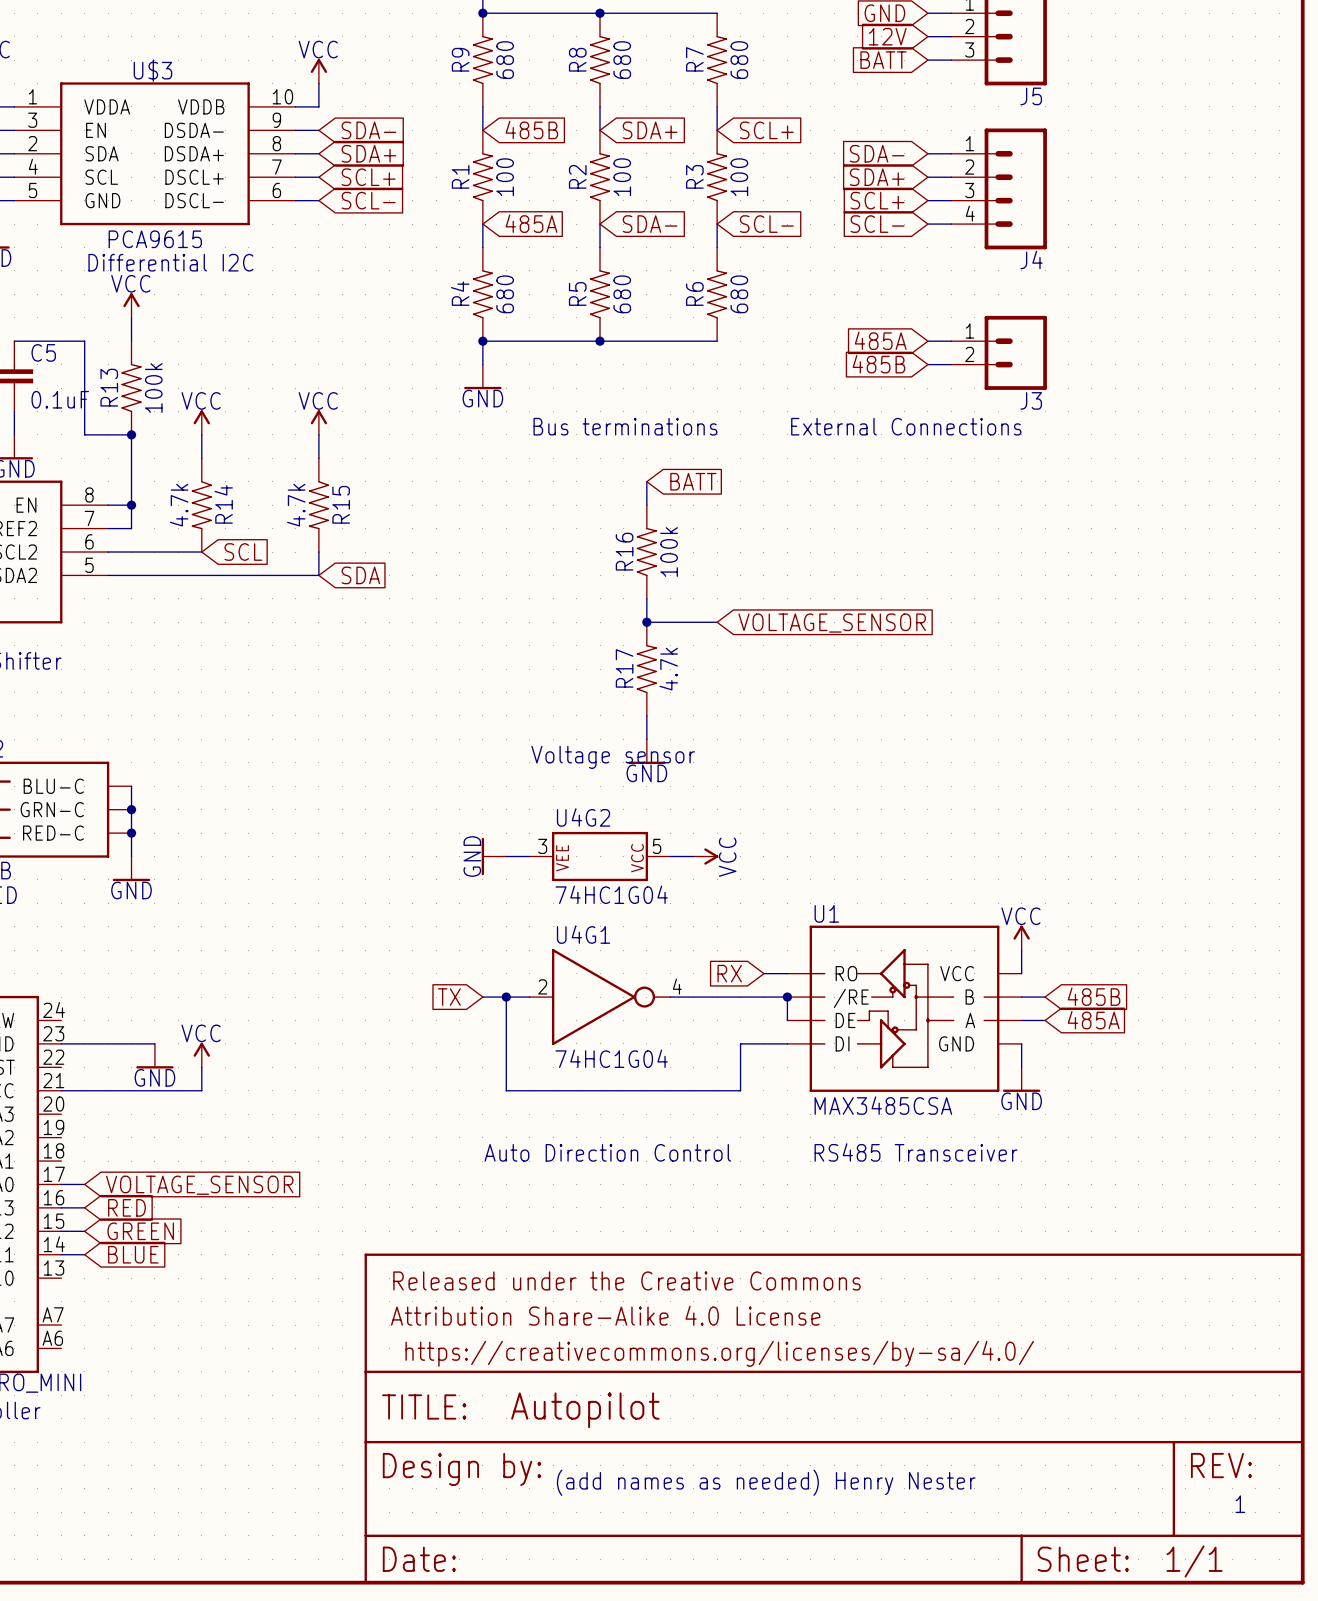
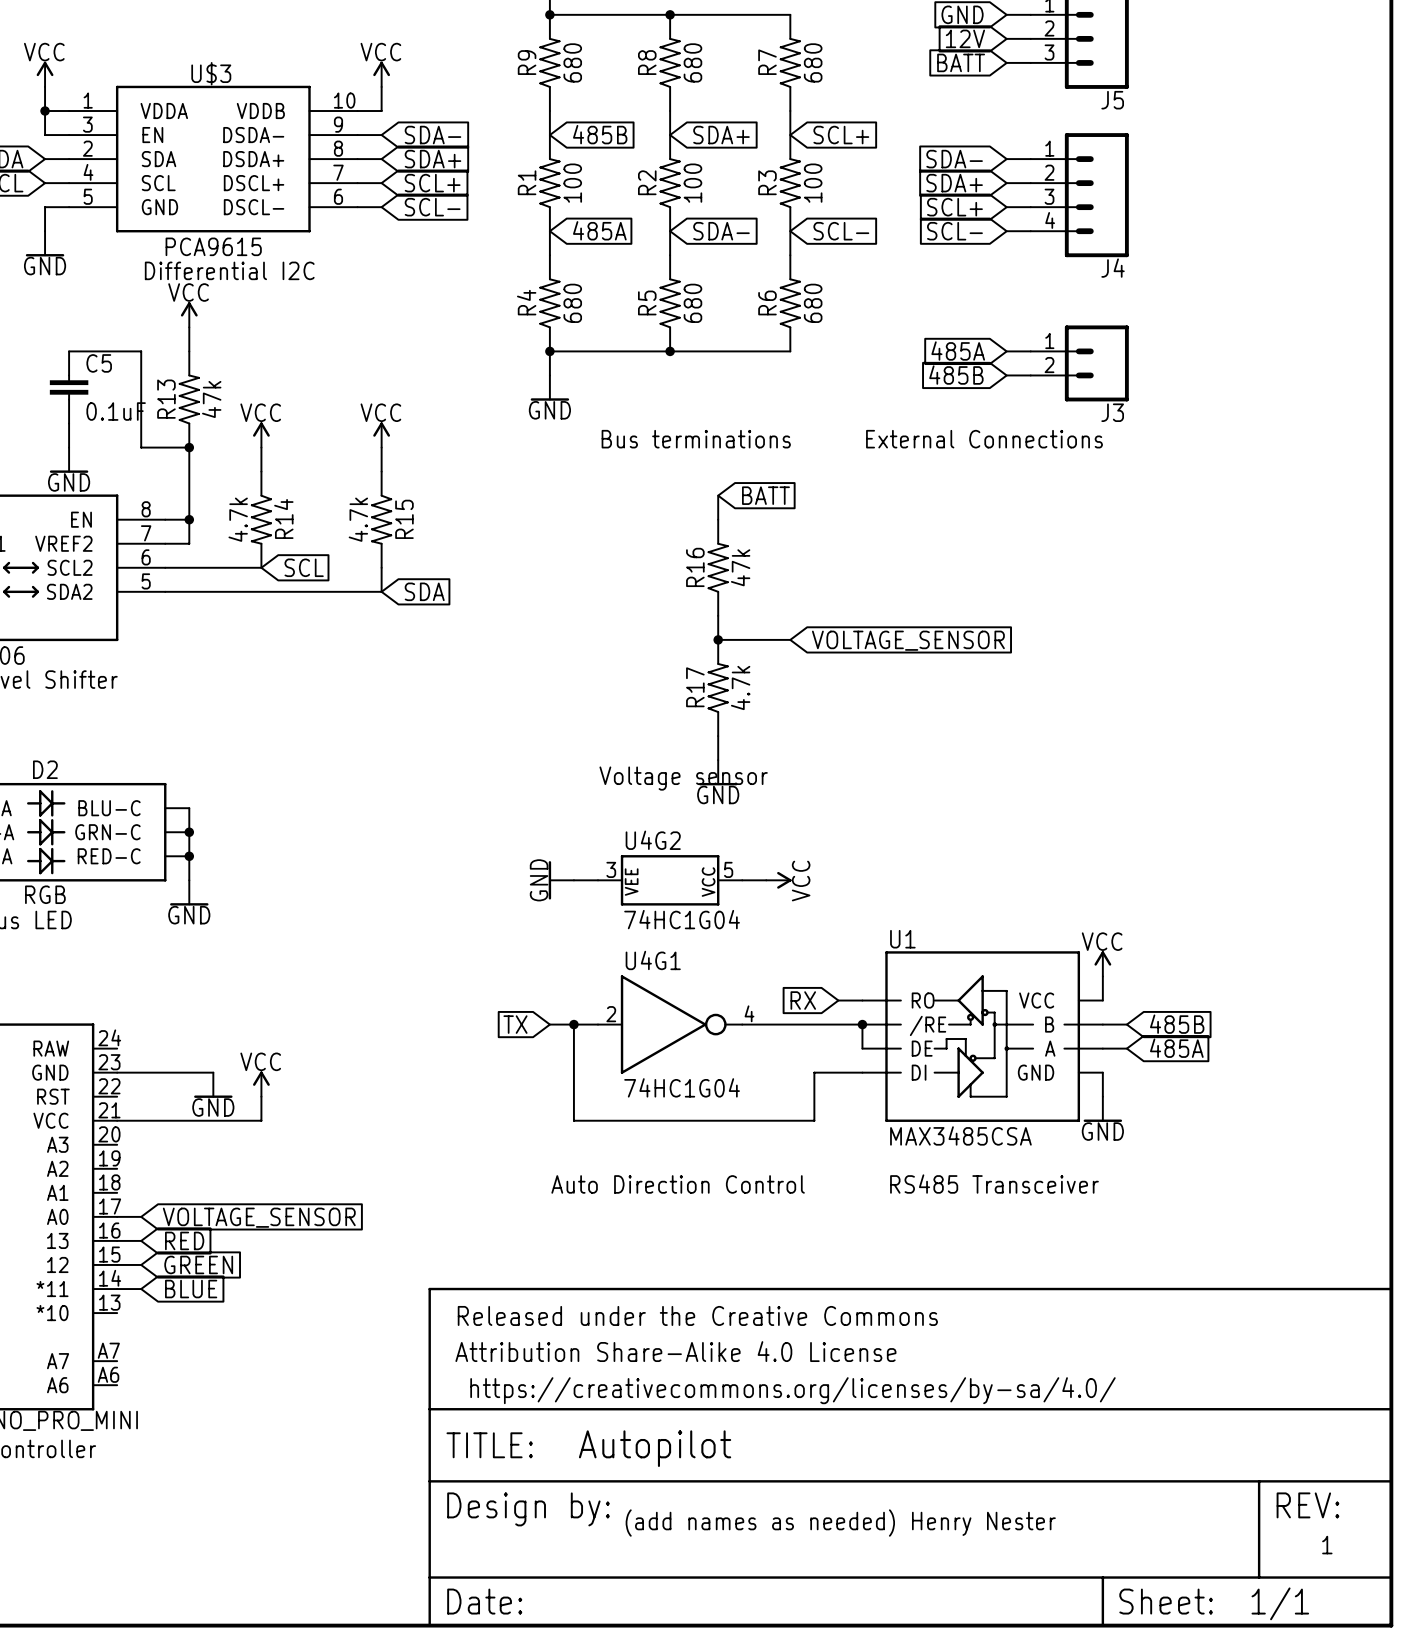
R13 value: 100k (153, 388) -> 47k (211, 399)
R16 value: 100k (669, 552) -> 47k (740, 567)

